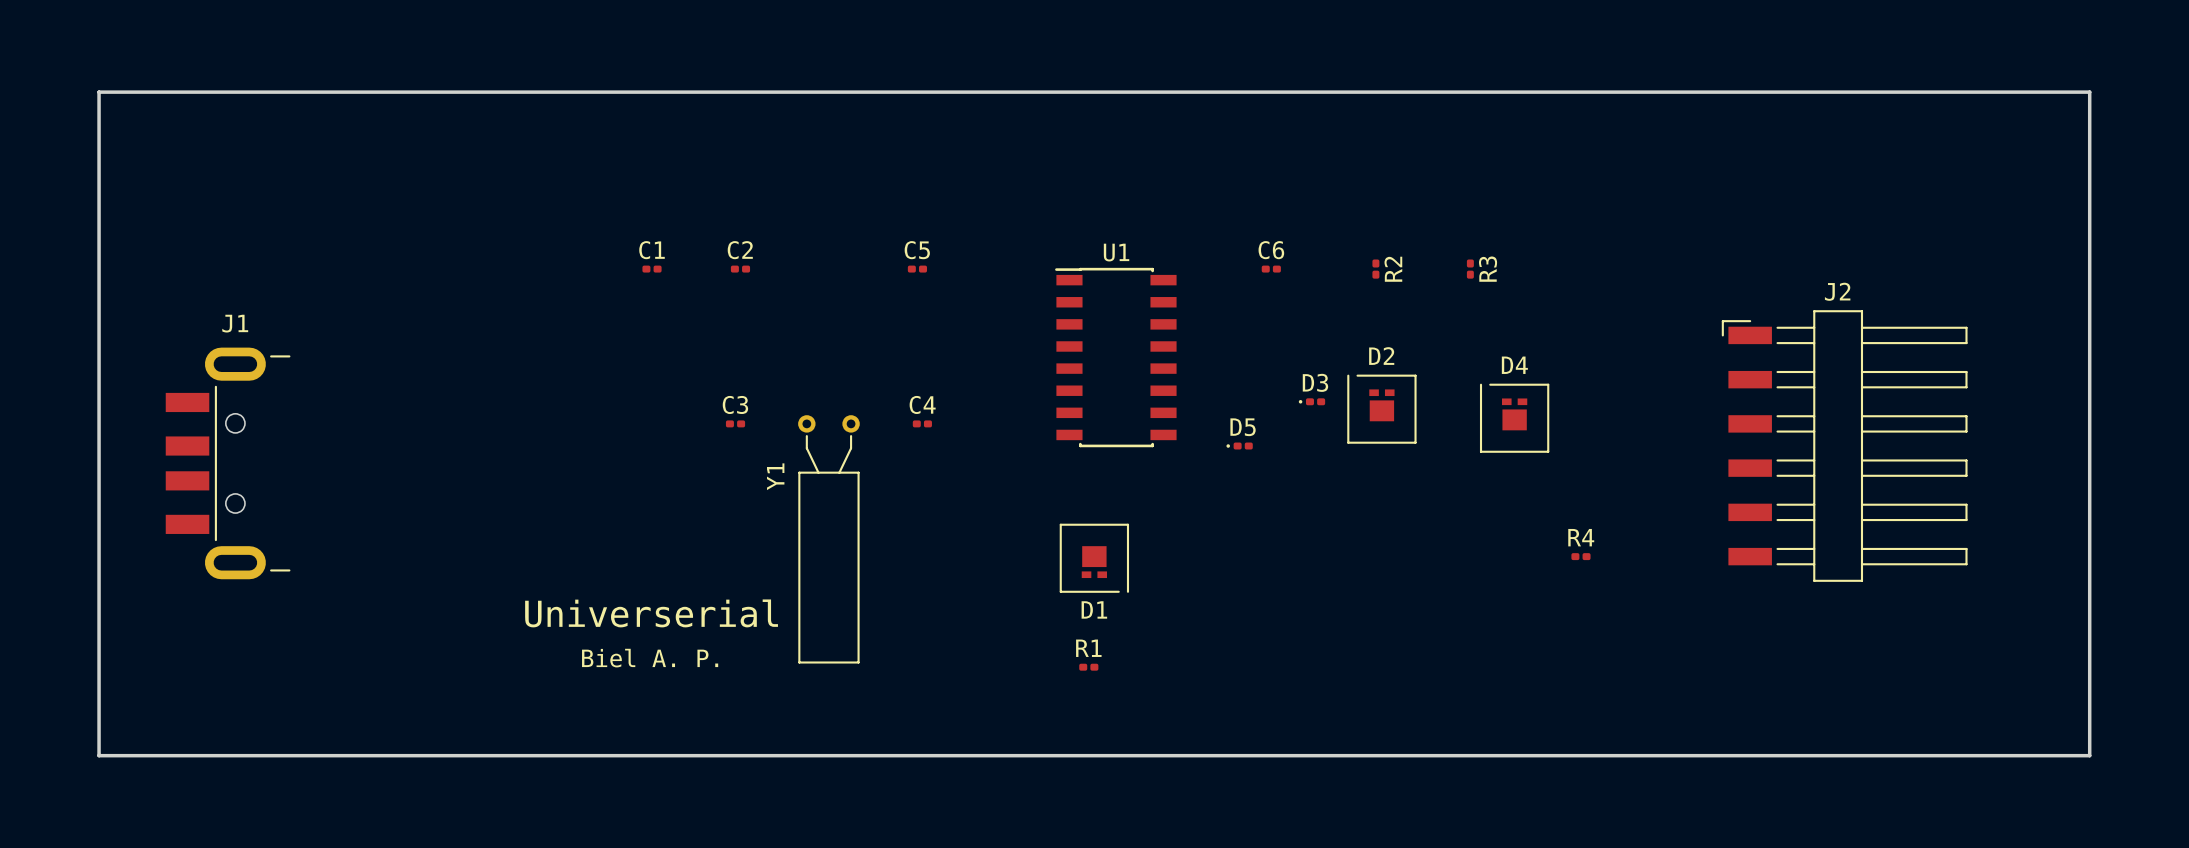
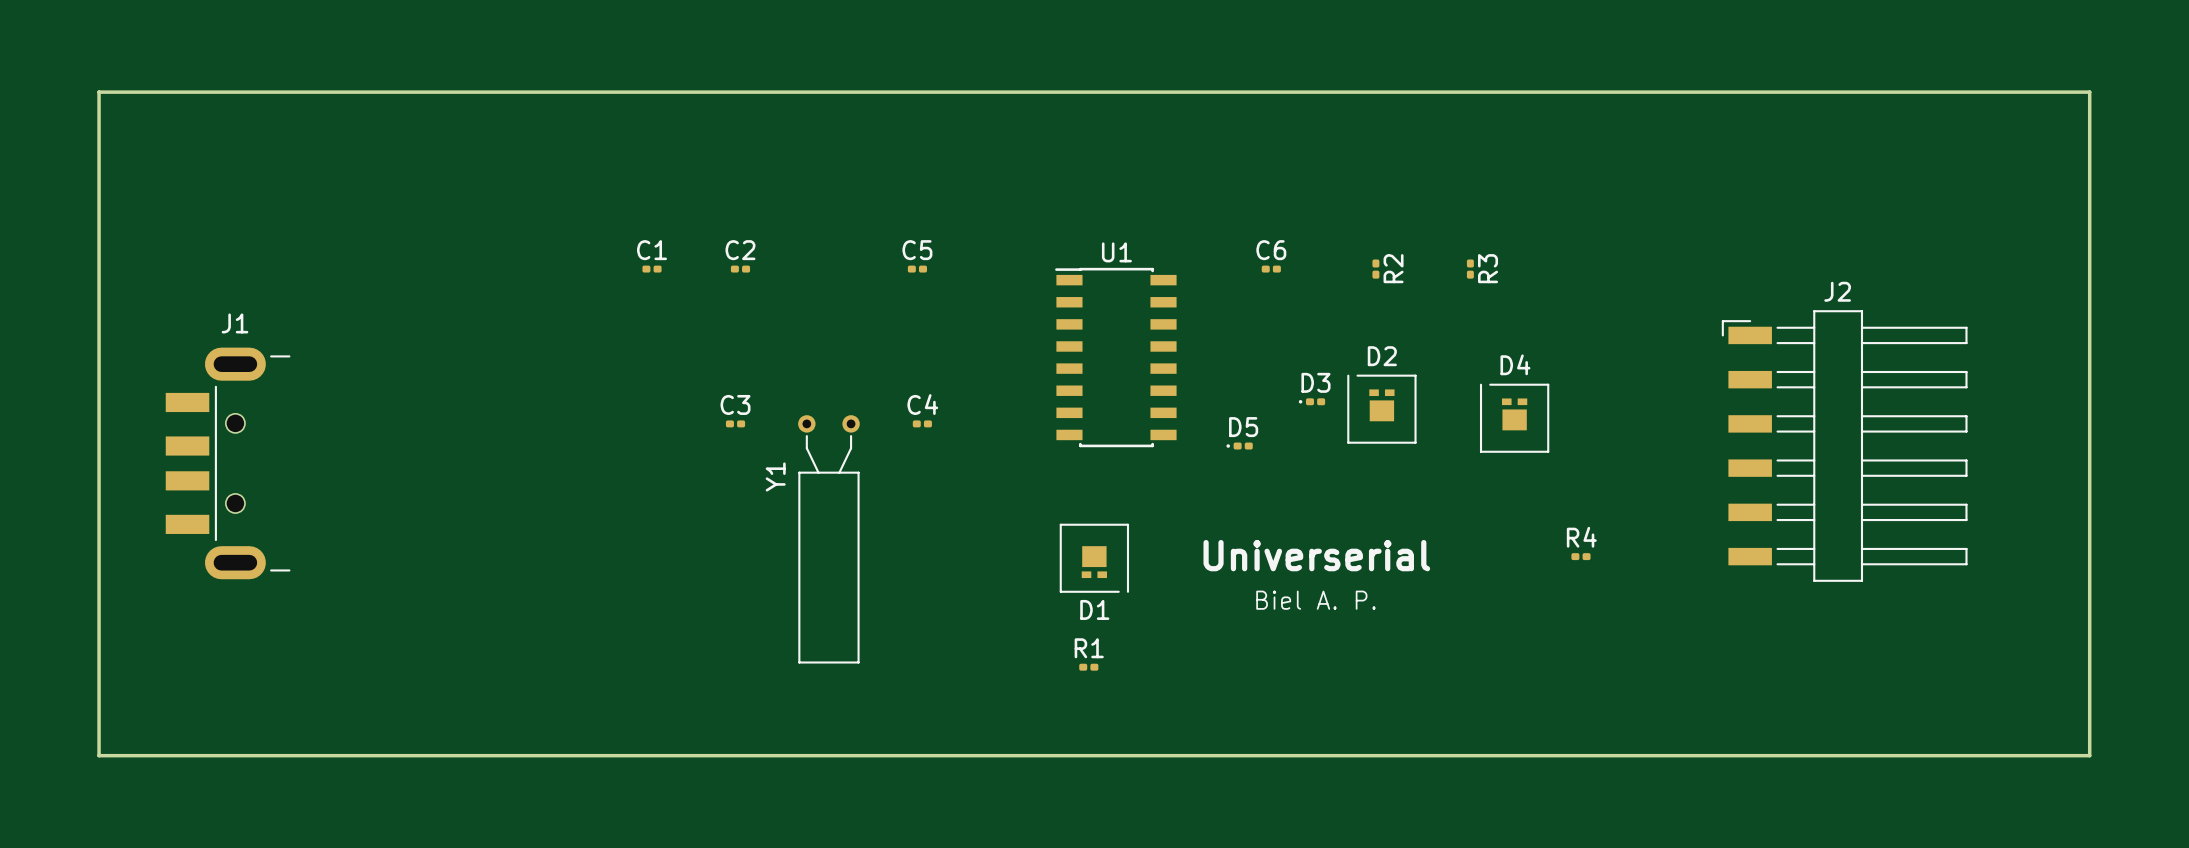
text: none -> Universerial (1316, 555)
text: none -> Biel A. P. (1315, 600)
text: Universerial (651, 613) -> none
text: Biel A. P. (650, 658) -> none

